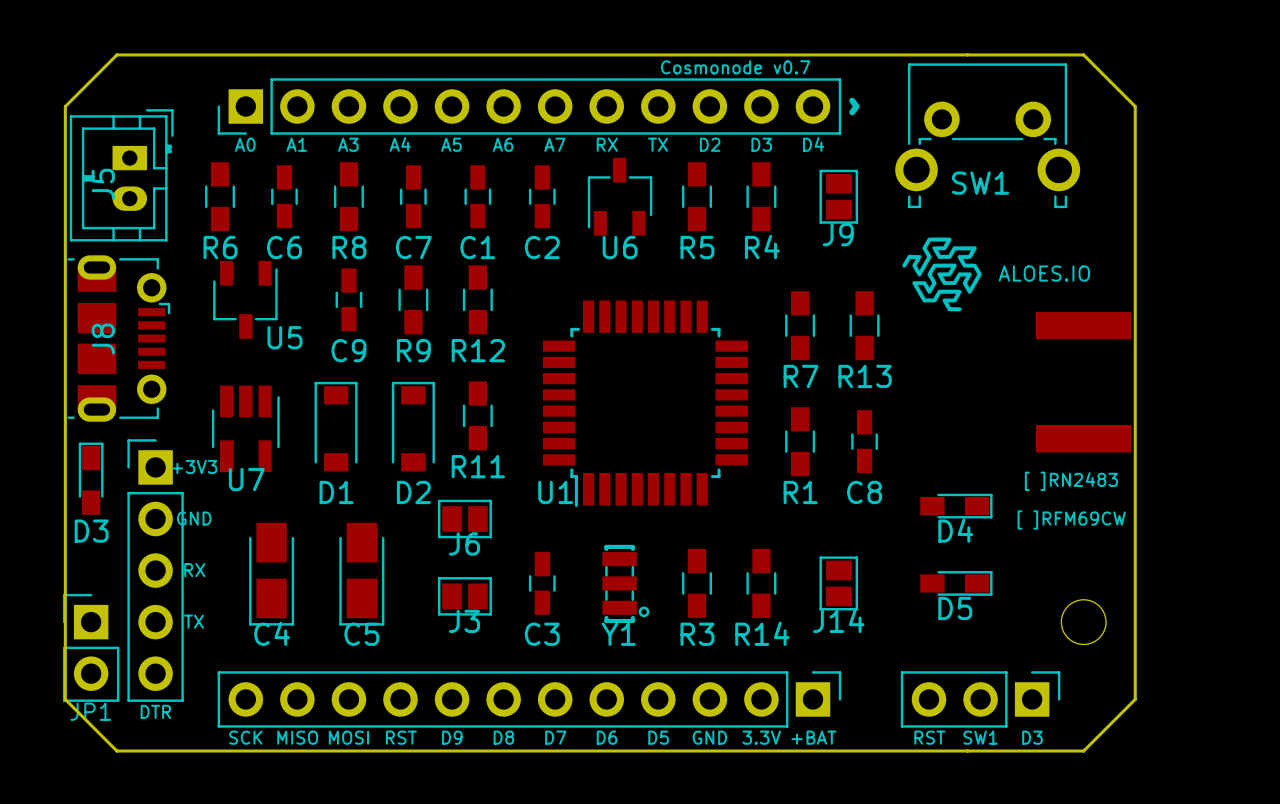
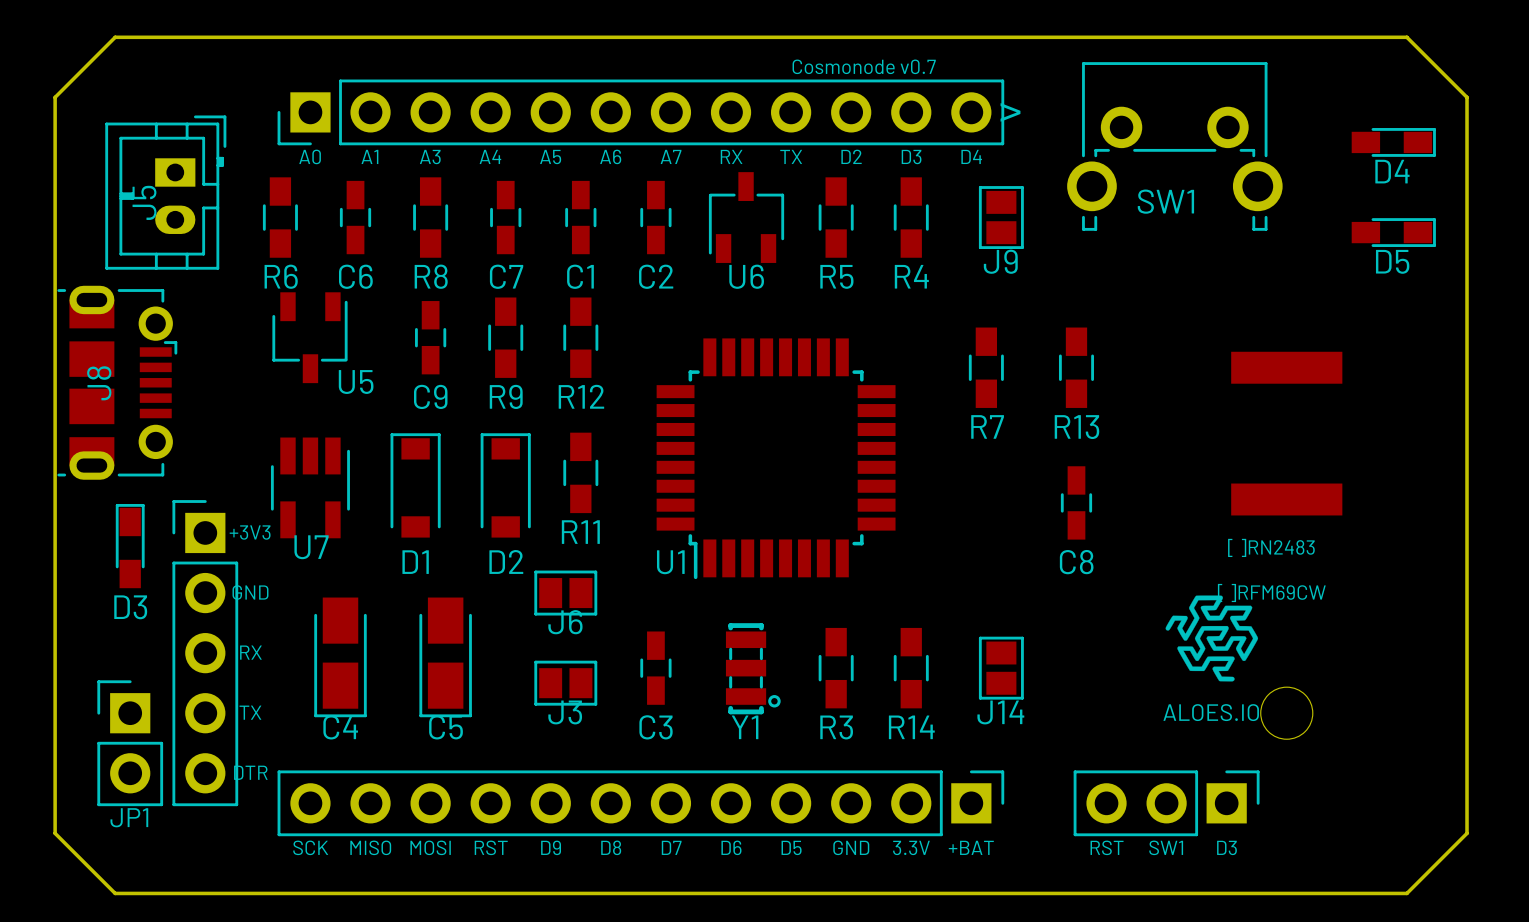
board edge: (116, 54) (1083, 54) (1135, 106) (1135, 699) (1083, 751) (116, 751) (65, 699) (65, 106) (116, 54) -> (115, 37) (55, 97) (55, 833) (115, 893) (1406, 893) (1467, 833) (1467, 97) (1406, 37) (115, 37)
text position: ALOES.IO (1044, 273) -> ALOES.IO (1211, 712)
drawing position: (942, 274) -> (1211, 638)
R7 position: (800, 325) -> (986, 367)
R13 position: (864, 325) -> (1076, 367)
J8 position: (118, 338) -> (117, 382)
R1: (800, 441) -> none
C8 position: (864, 441) -> (1076, 502)
D4 position: (956, 506) -> (1393, 142)
D5 position: (956, 583) -> (1393, 232)
text position: DTR (155, 711) -> DTR (250, 772)

